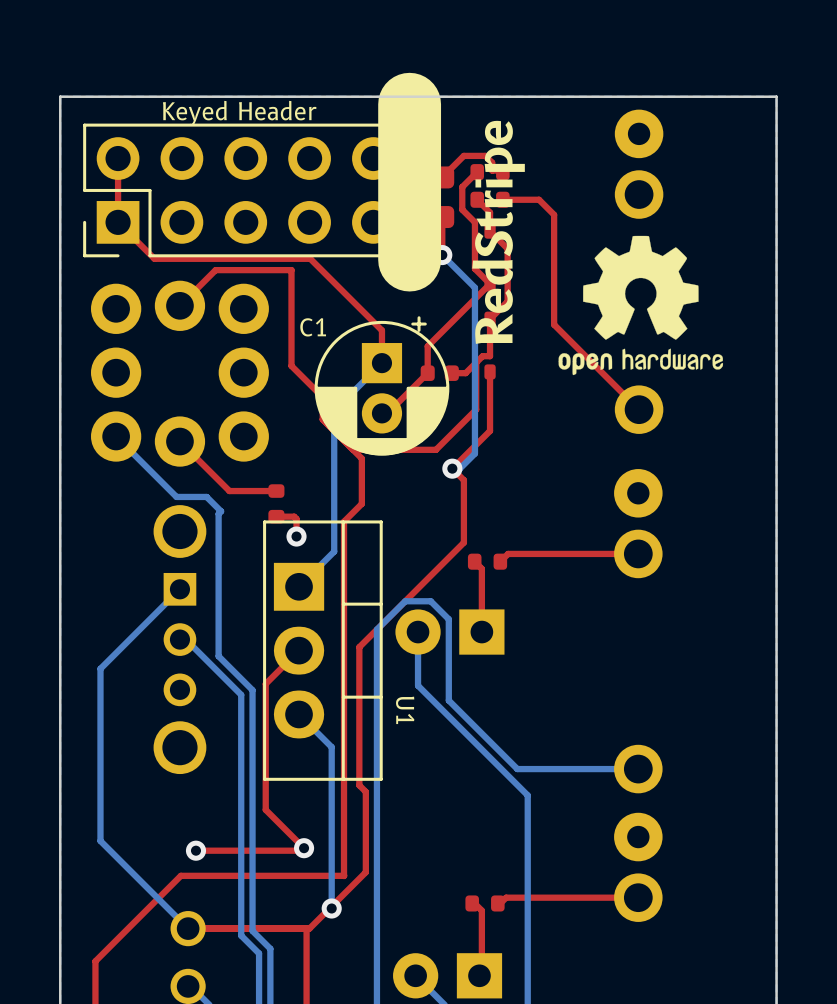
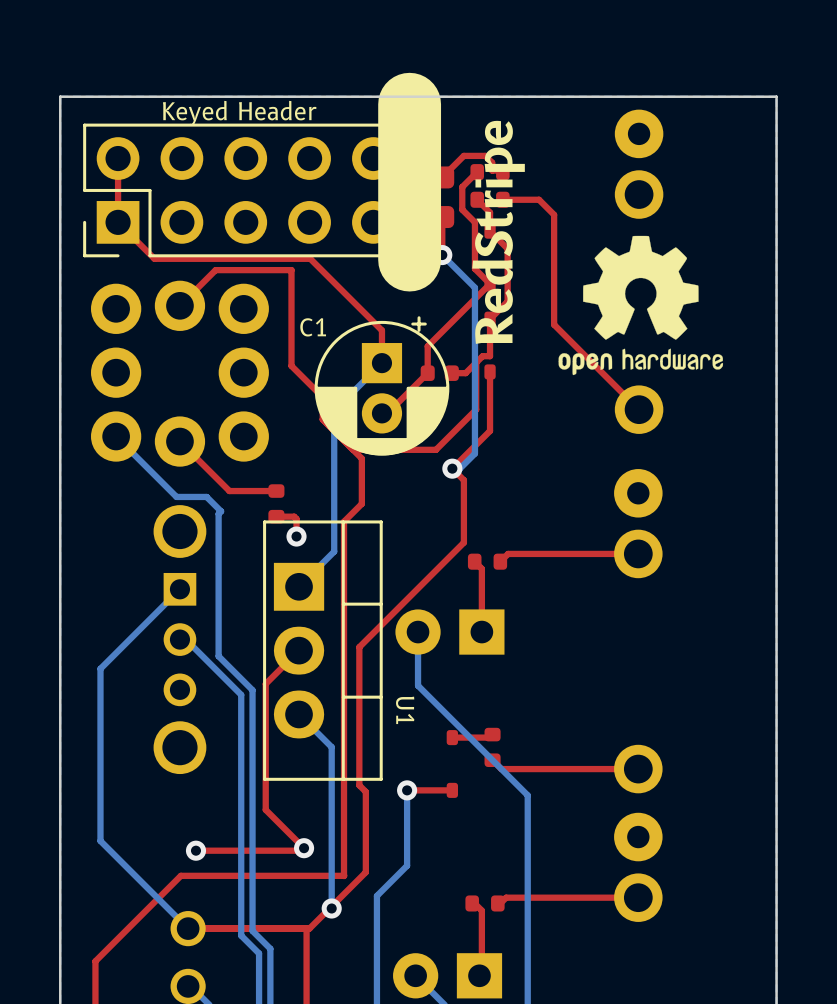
top track: none -> (492, 734) (489, 737) (452, 737)
part: none -> (492, 747)
top track: none -> (492, 760) (501, 769) (638, 769)
part: none -> (452, 763)
bottom track: (638, 769) (517, 769) (448, 700) (448, 619) (430, 601) (405, 601) (376, 629) (376, 895) -> (407, 790) (407, 865) (376, 895)
via: none -> (407, 790)
top track: none -> (452, 790) (407, 790)

